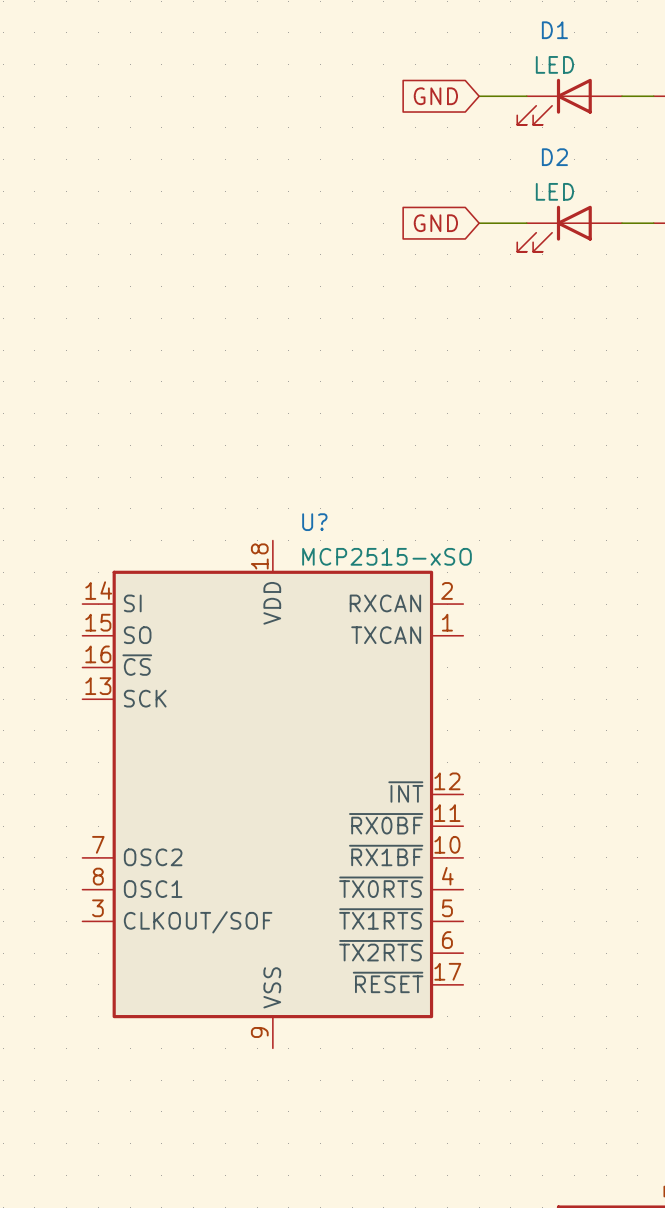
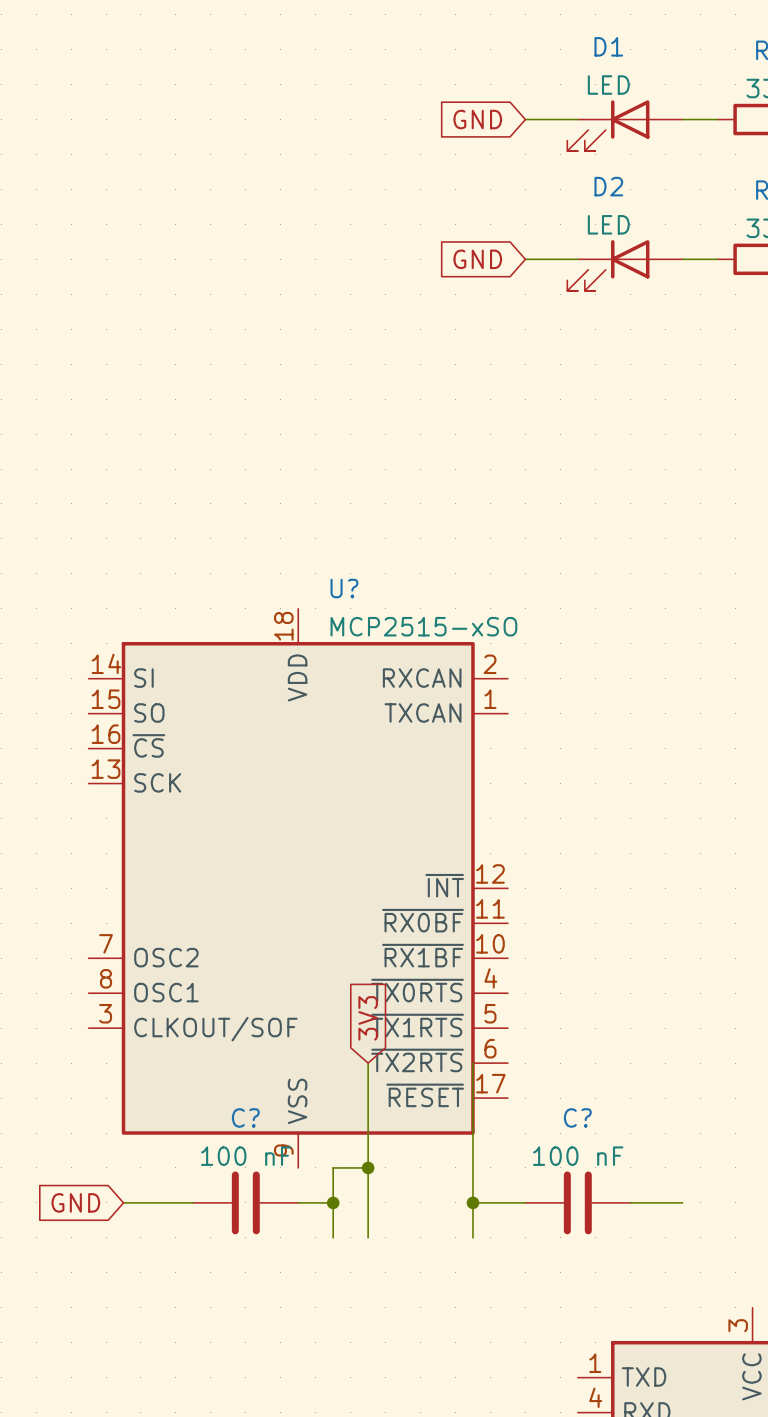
global label: none -> 3V3 (368, 1018)
wire: none -> (368, 1063) (368, 1237)
wire: none -> (472, 1063) (472, 1237)
wire: none -> (368, 1167) (333, 1167) (333, 1237)
junction: none -> (368, 1167)
global label: none -> GND (75, 1202)
wire: none -> (123, 1202) (193, 1202)
C?: none -> 100 nF (245, 1202)
wire: none -> (298, 1202) (333, 1202)
junction: none -> (333, 1202)
wire: none -> (472, 1202) (525, 1202)
junction: none -> (472, 1202)
C?: none -> 100 nF (577, 1202)
wire: none -> (630, 1202) (682, 1202)

